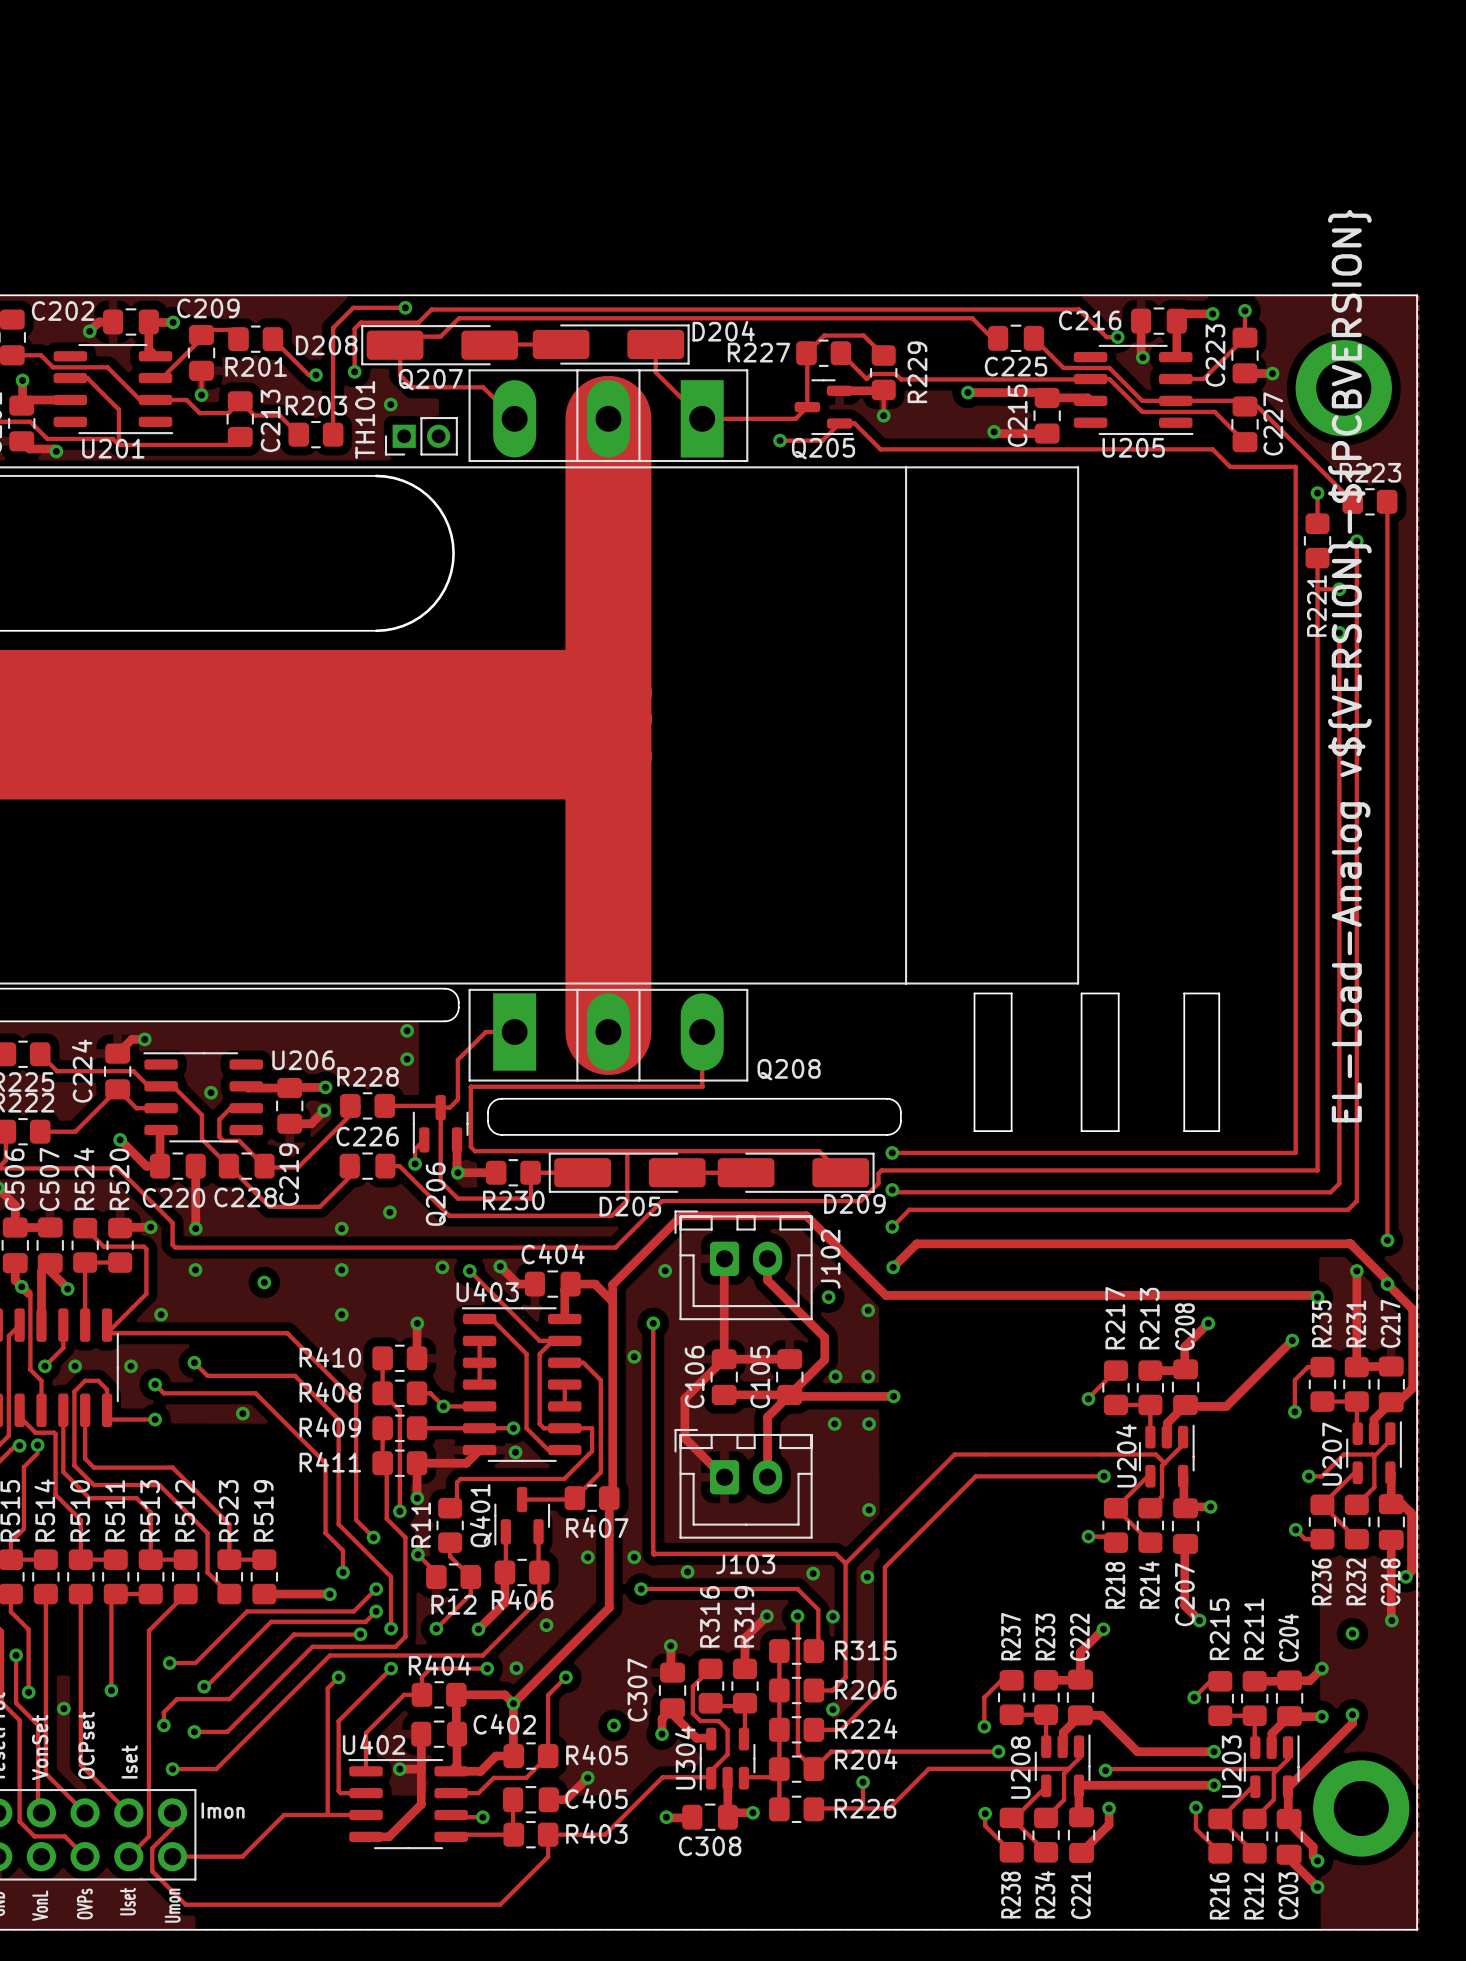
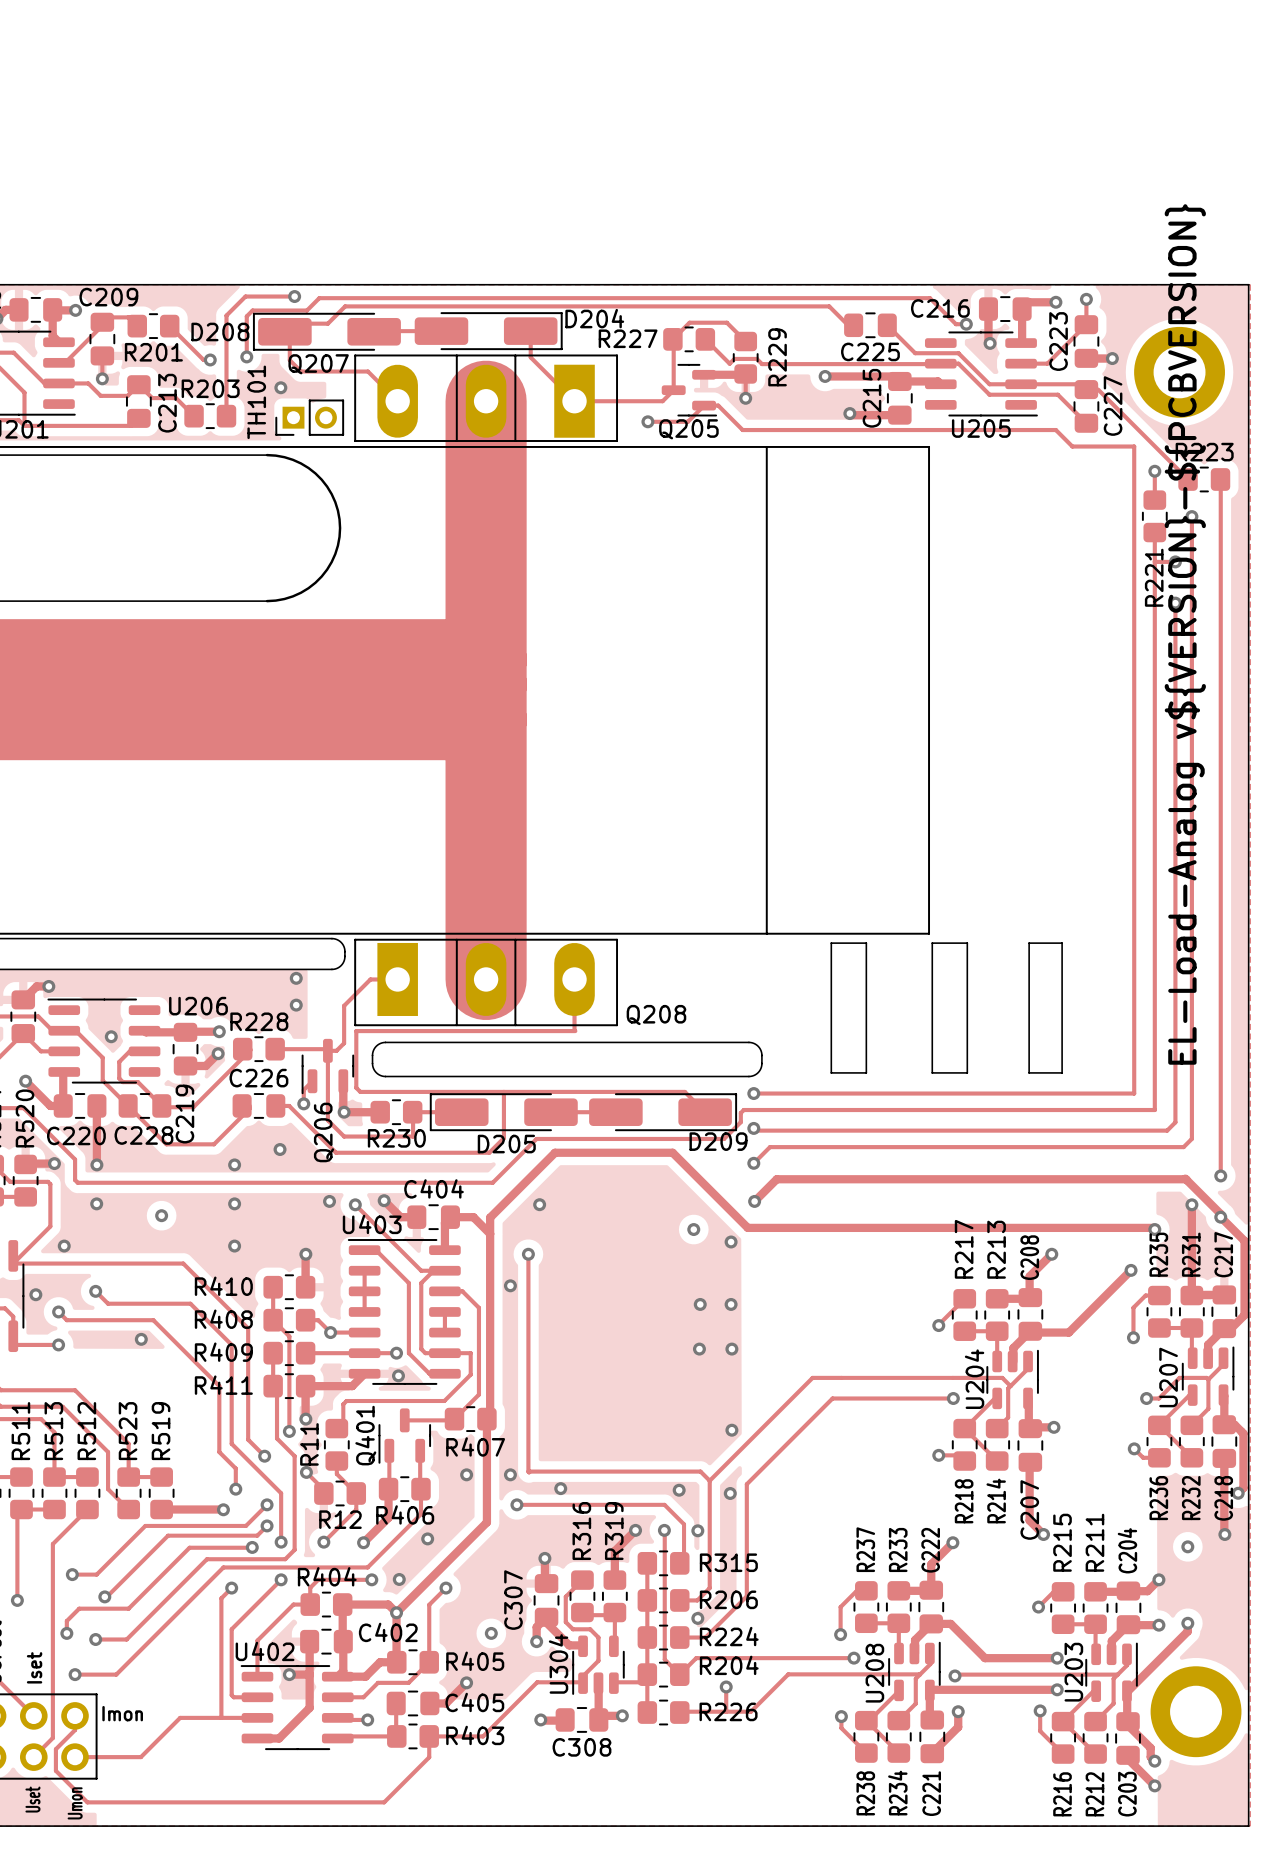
track: (724, 1258) (724, 1359) -> none
track: (767, 1258) (767, 1280) (824, 1337) (824, 1359) (767, 1417) (767, 1477) -> none
J102: (743, 1265) -> none
track: (724, 1359) (684, 1398) (684, 1438) (724, 1477) -> none
track: (724, 1359) (789, 1359) -> none
C106: (724, 1377) -> none
C105: (789, 1377) -> none
track: (724, 1394) (893, 1396) -> none
via: (893, 1396) -> none
J103: (743, 1483) -> none

